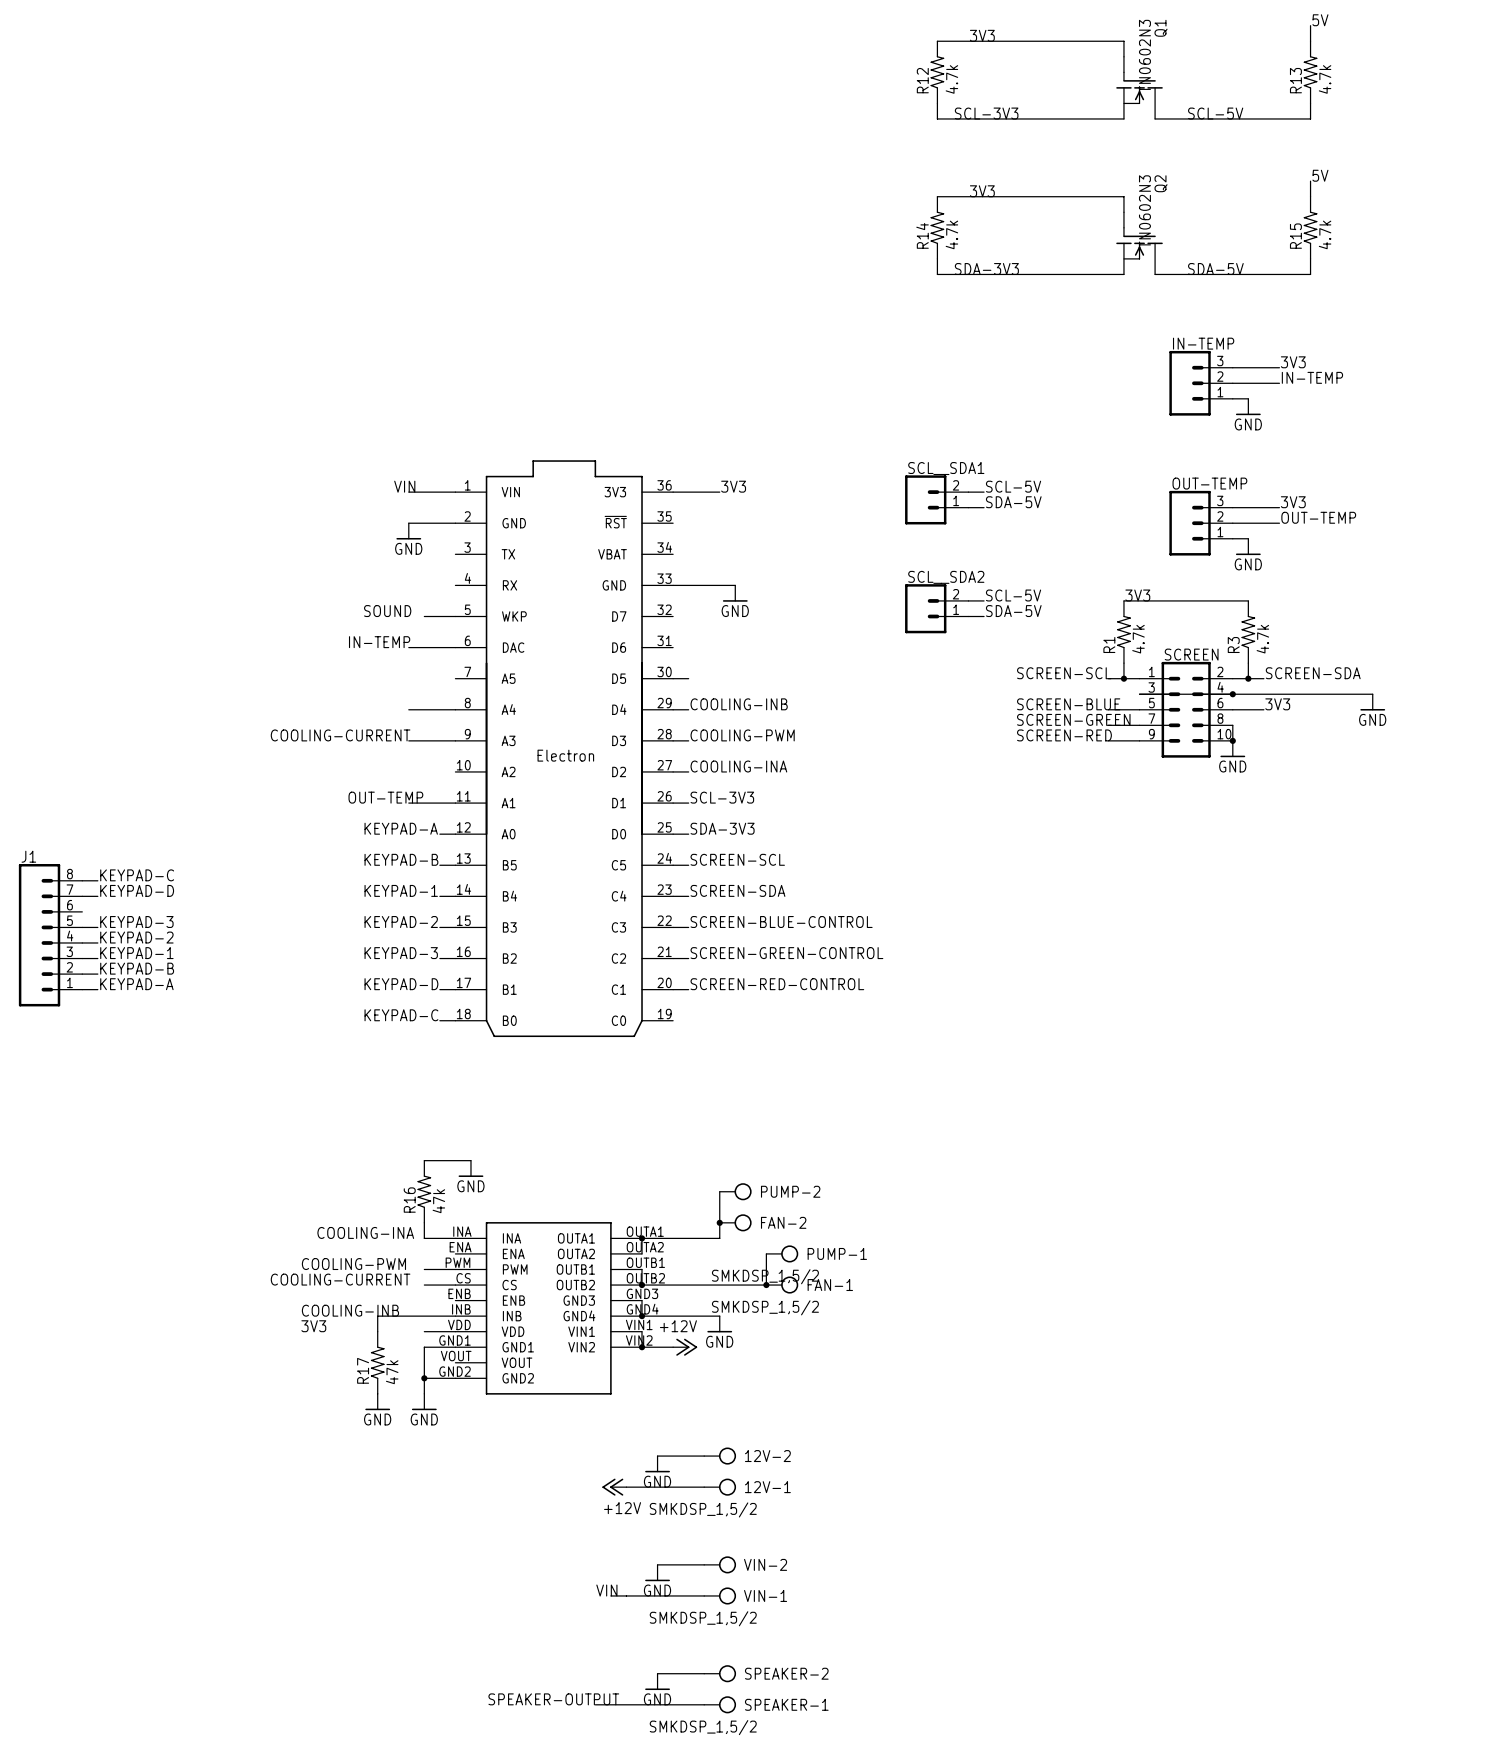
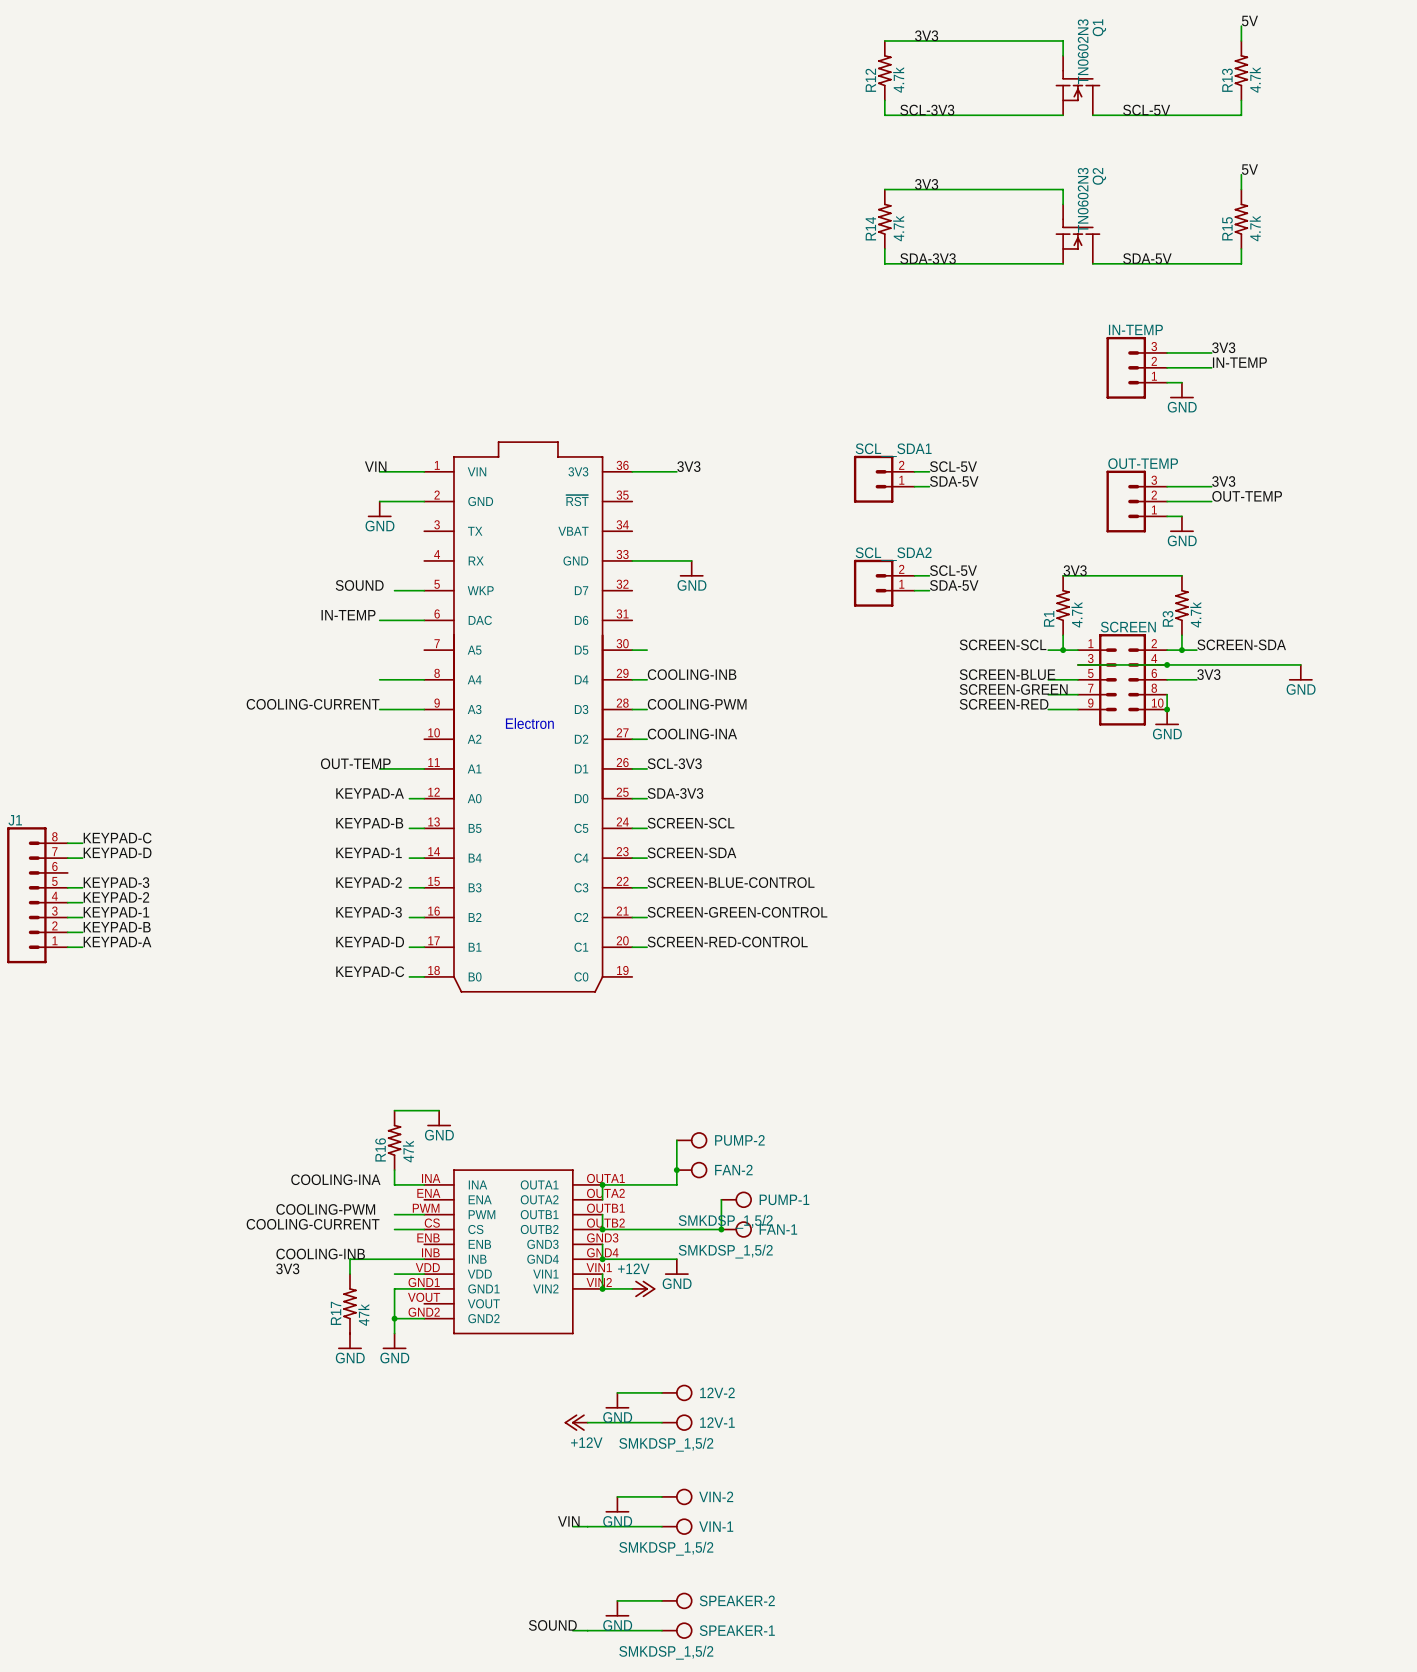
label: SPEAKER-OUTPUT (553, 1699) -> none
label: none -> SOUND (552, 1625)
wire: (595, 1704) (610, 1704) -> none

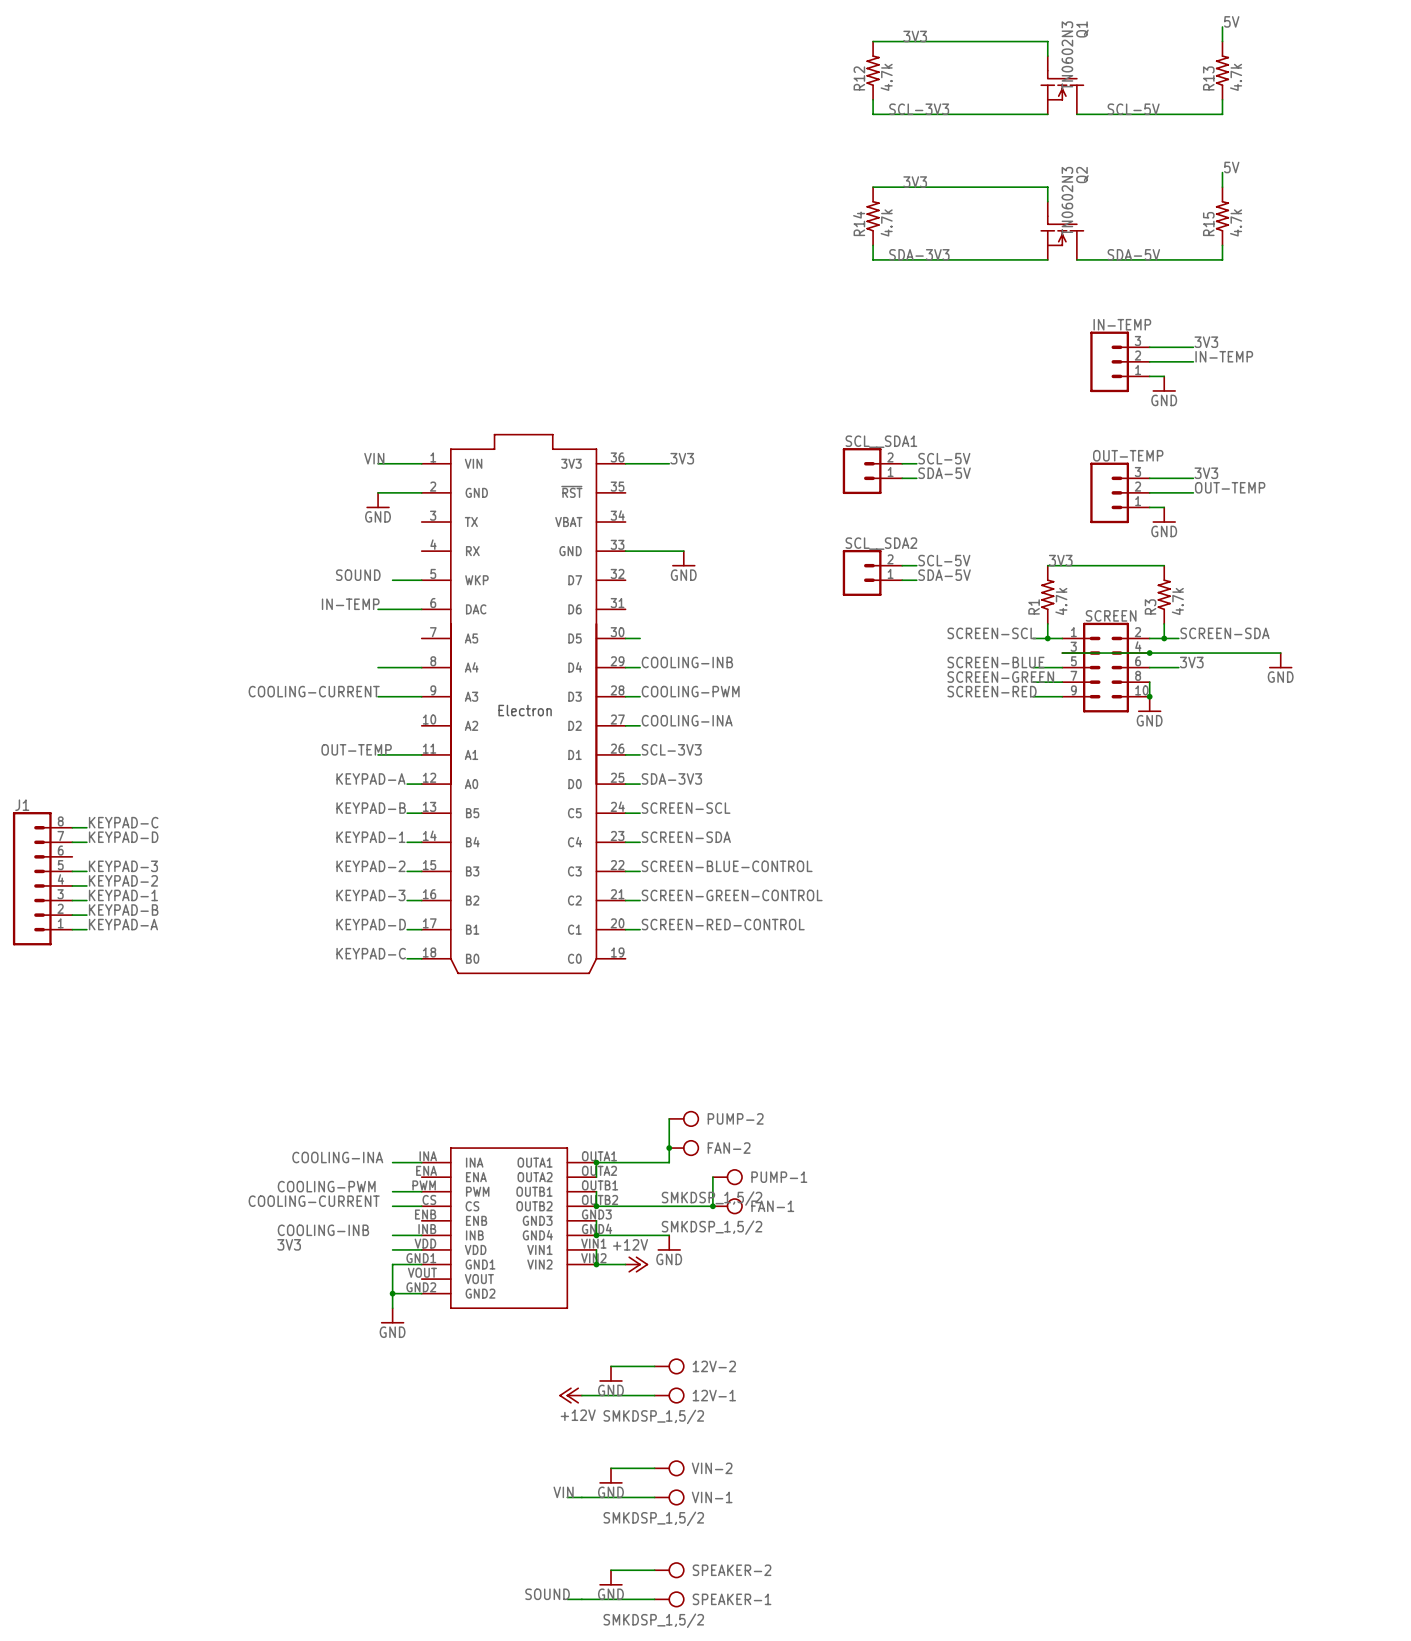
wire: (394, 1110) (439, 1110) -> none
power symbol: GND (439, 1118) -> none
R16: 47k (394, 1140) -> none
wire: (394, 1170) (394, 1184) -> none
wire: (394, 1259) (349, 1259) (349, 1274) -> none
R17: 47k (349, 1303) -> none
power symbol: GND (349, 1341) -> none

